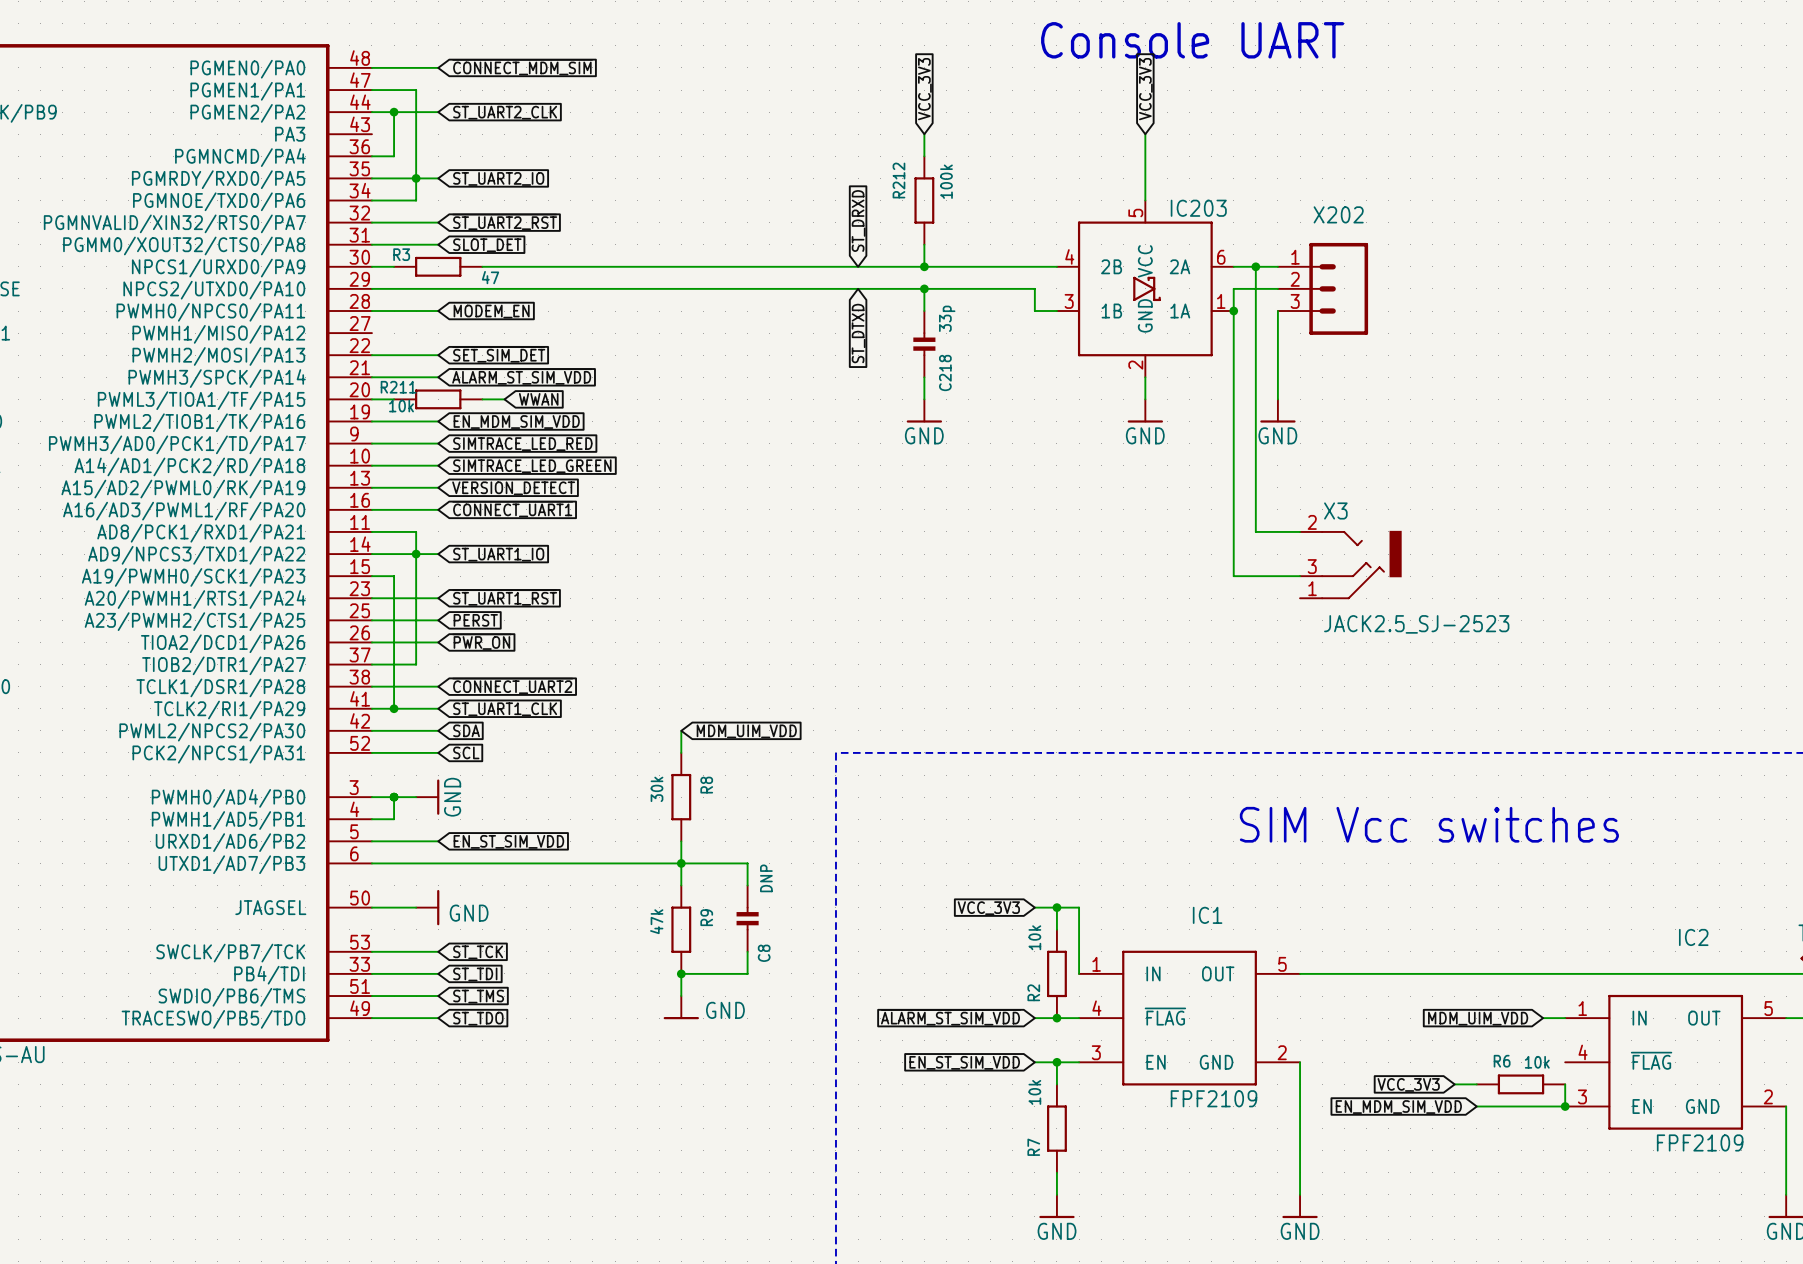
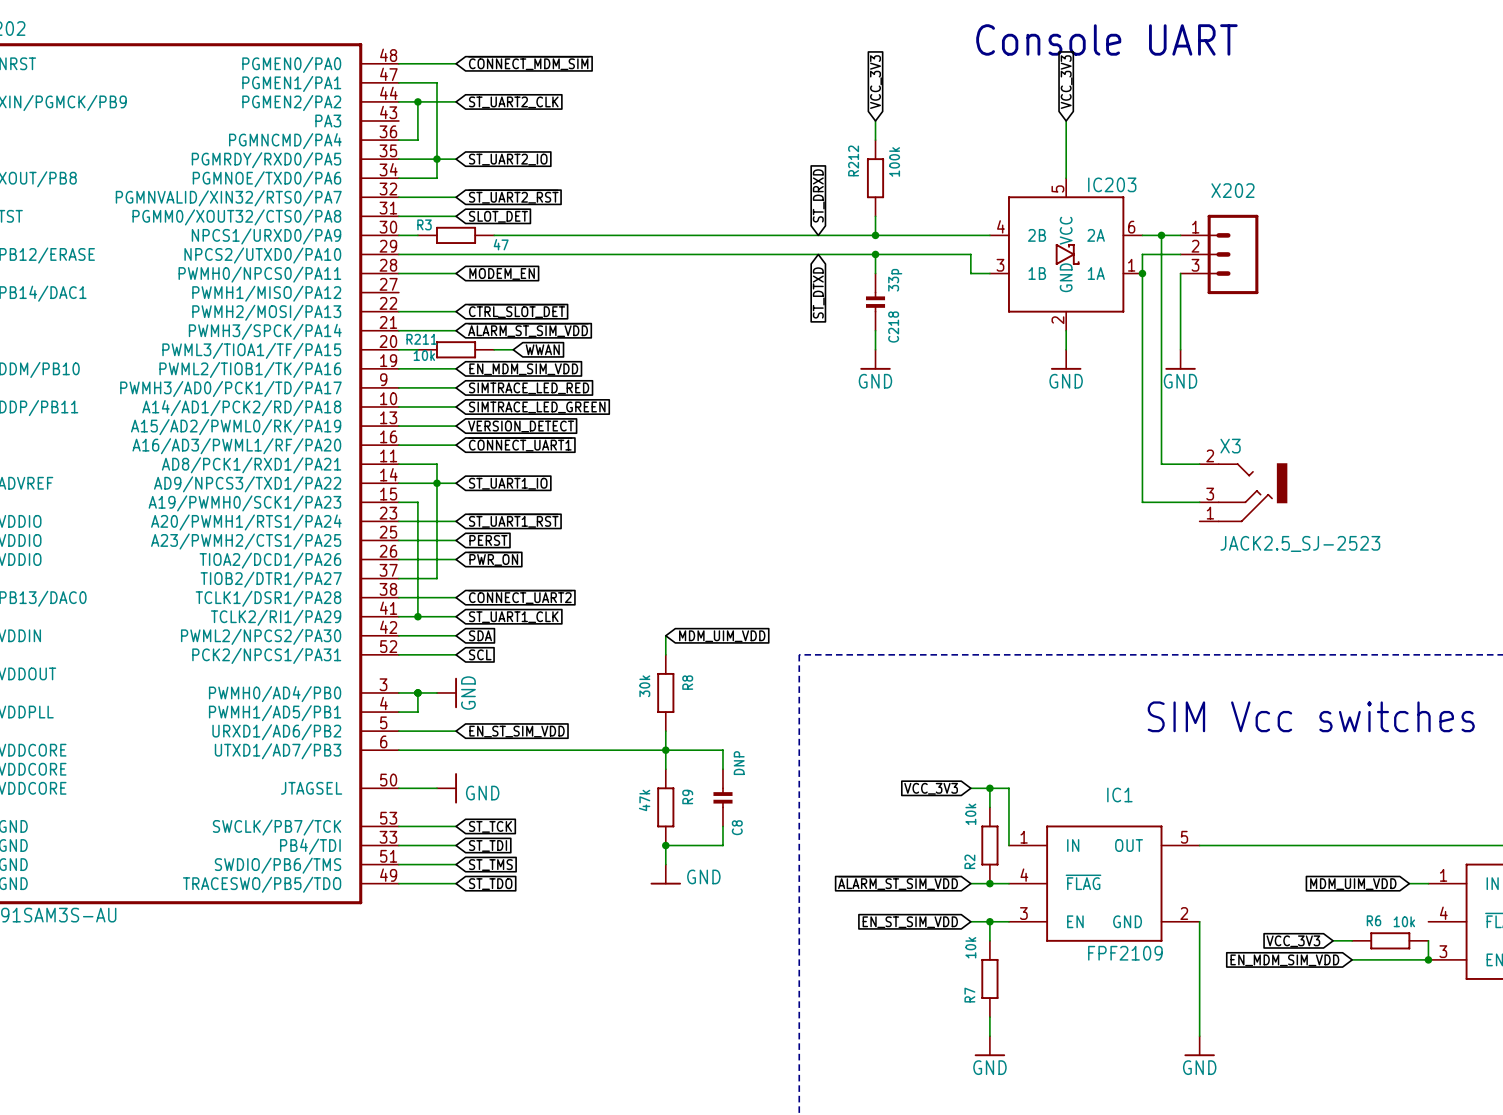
global label: ~{SET_SIM_DET} (498, 354) -> ~{CTRL_SLOT_DET} (516, 311)

